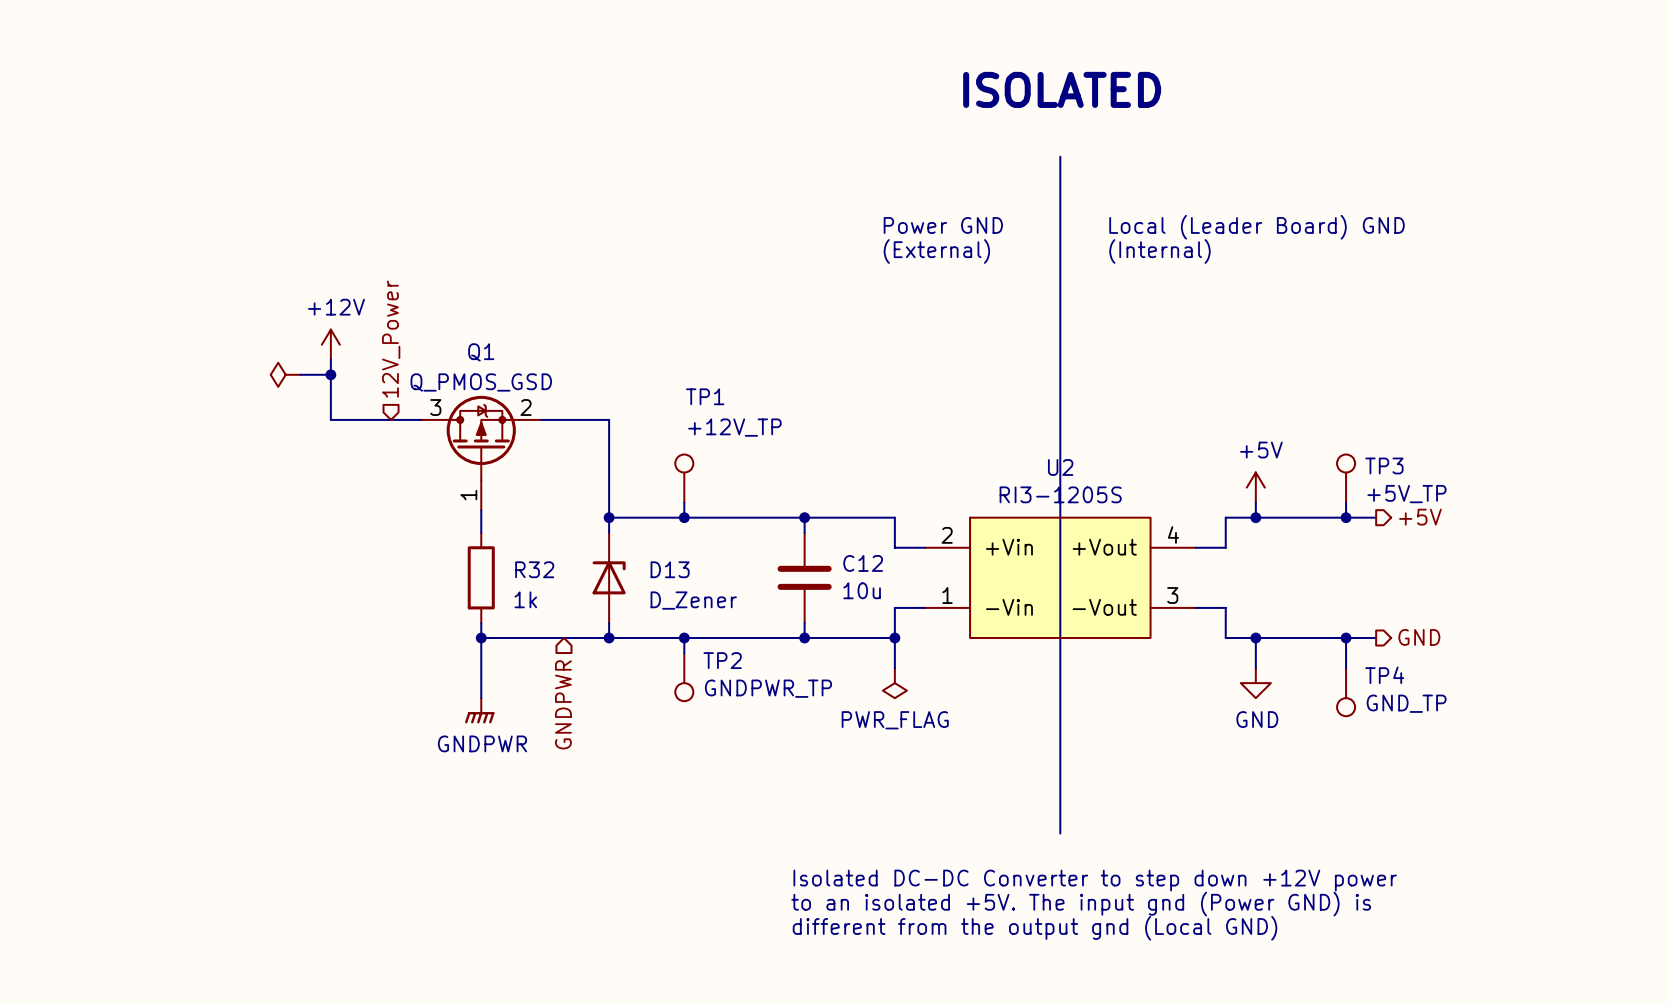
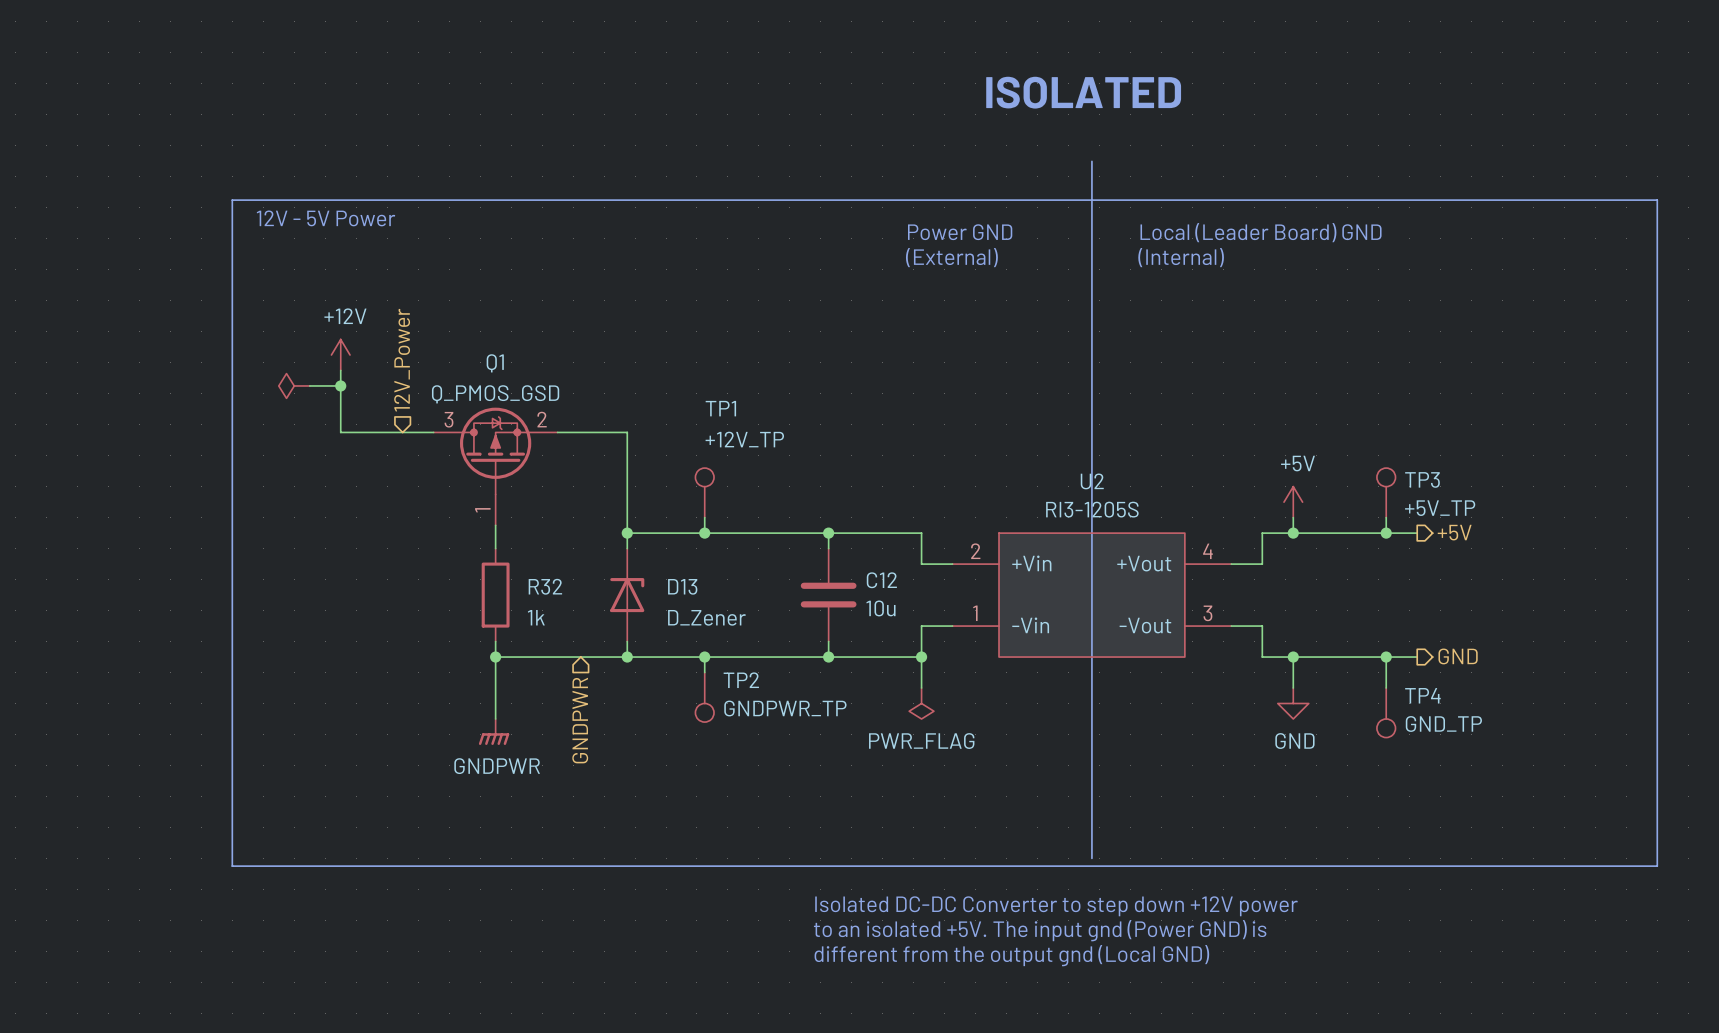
line: none -> (232, 200) (1657, 200) (1657, 866) (232, 866) (232, 200)
text: none -> 12V - 5V Power (326, 218)

